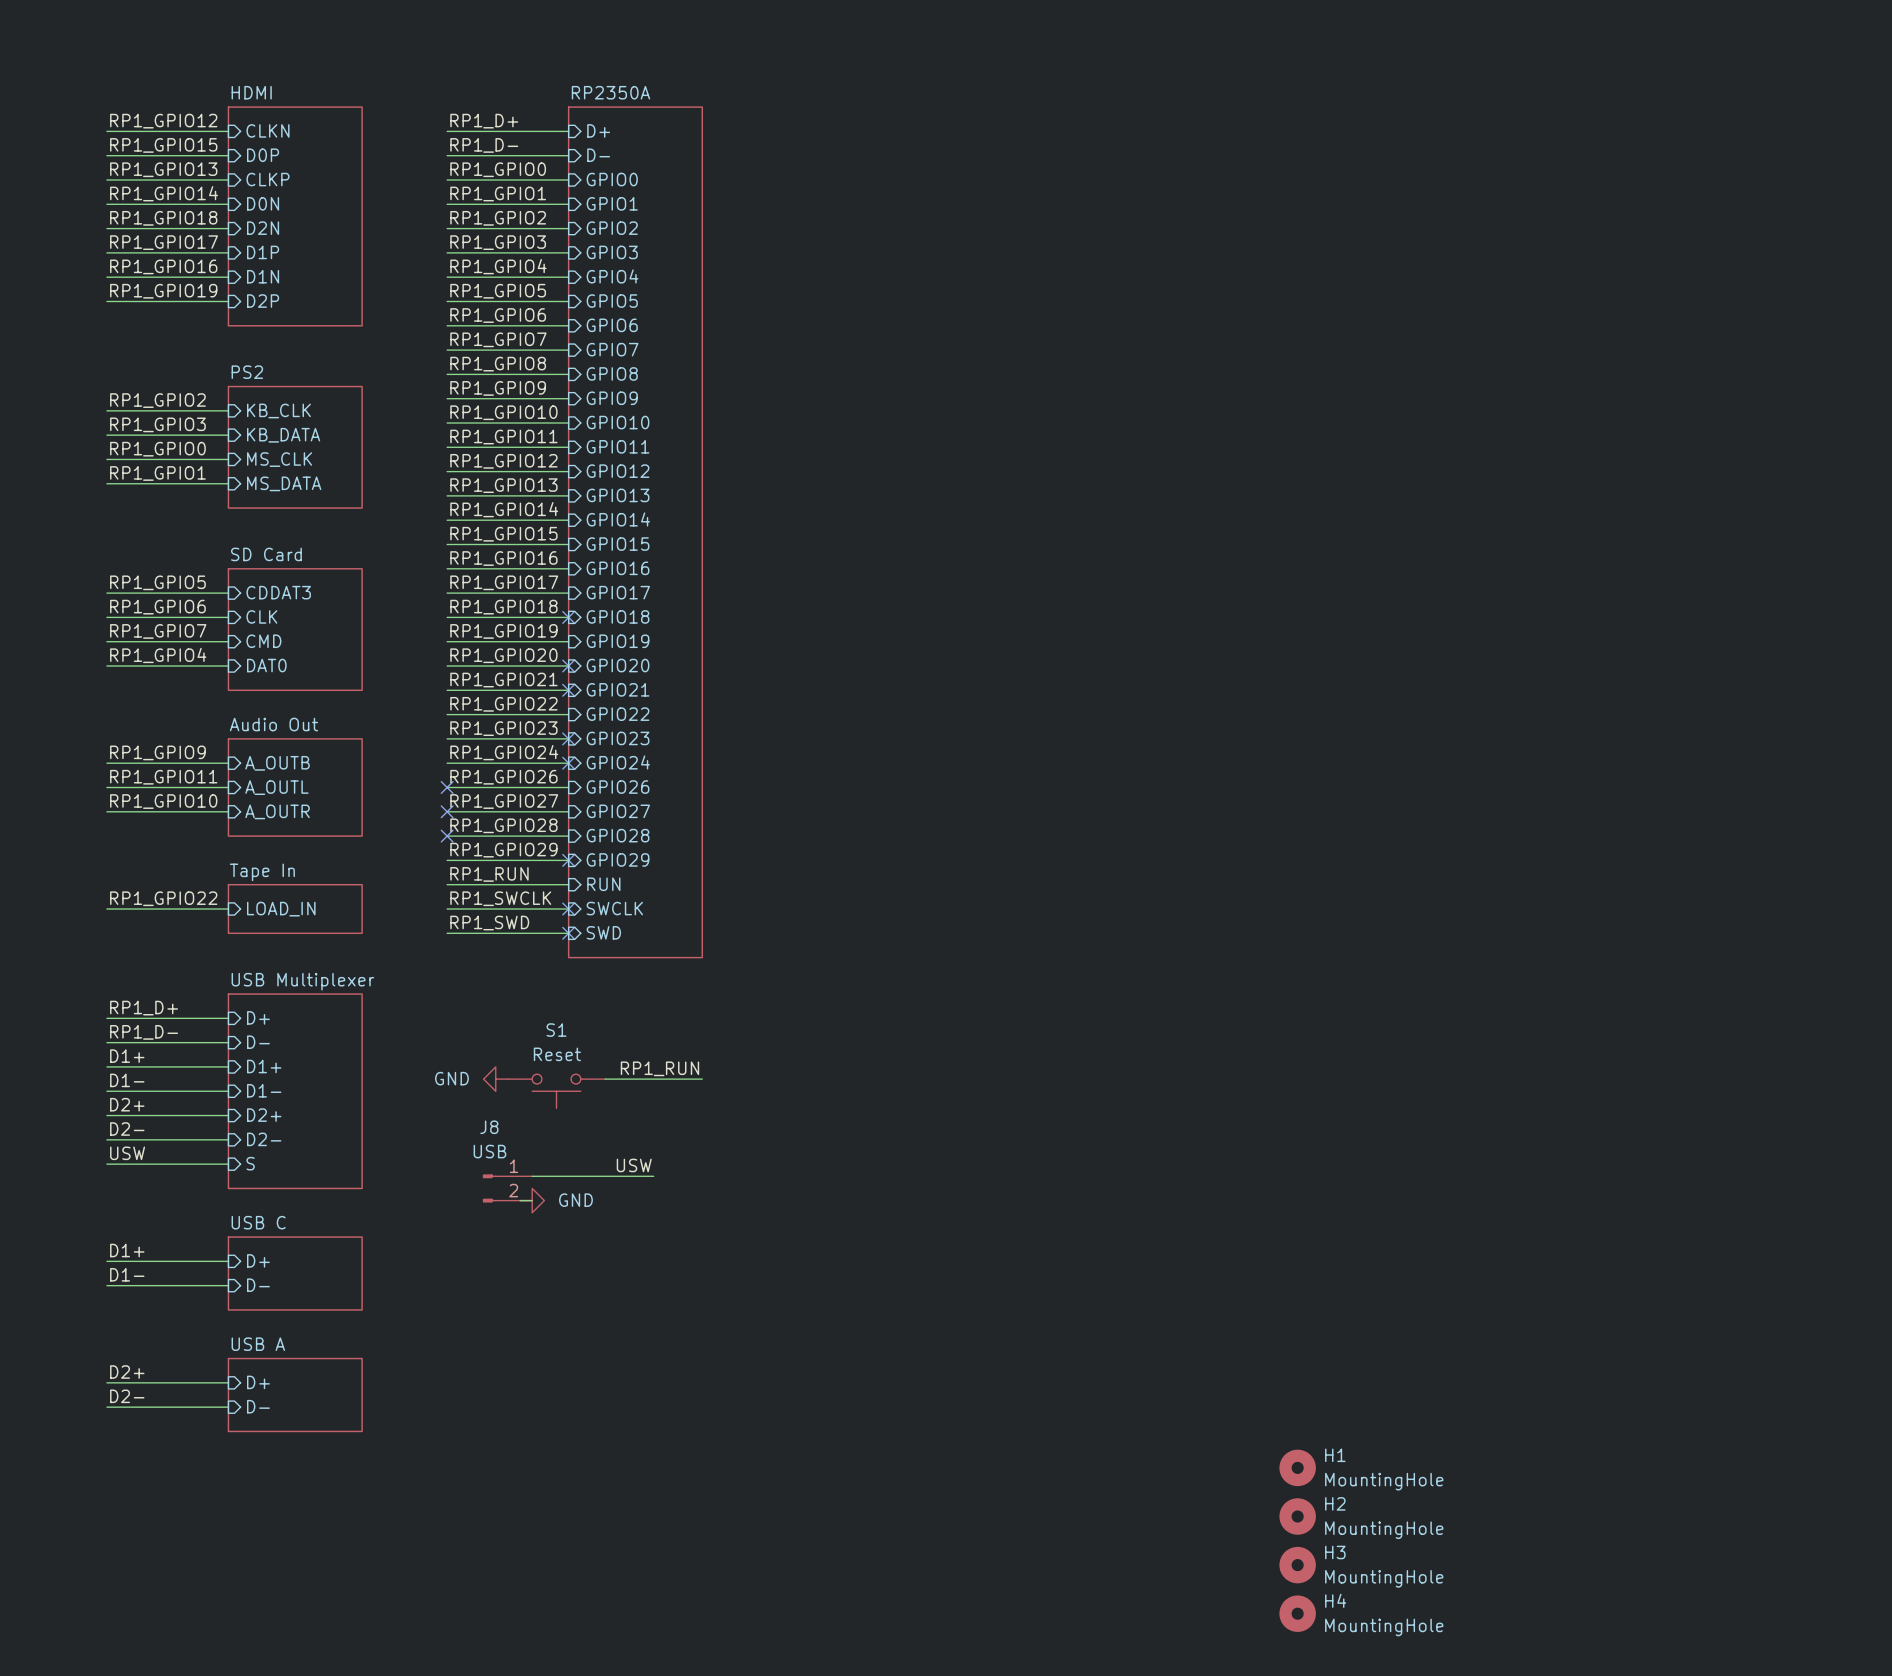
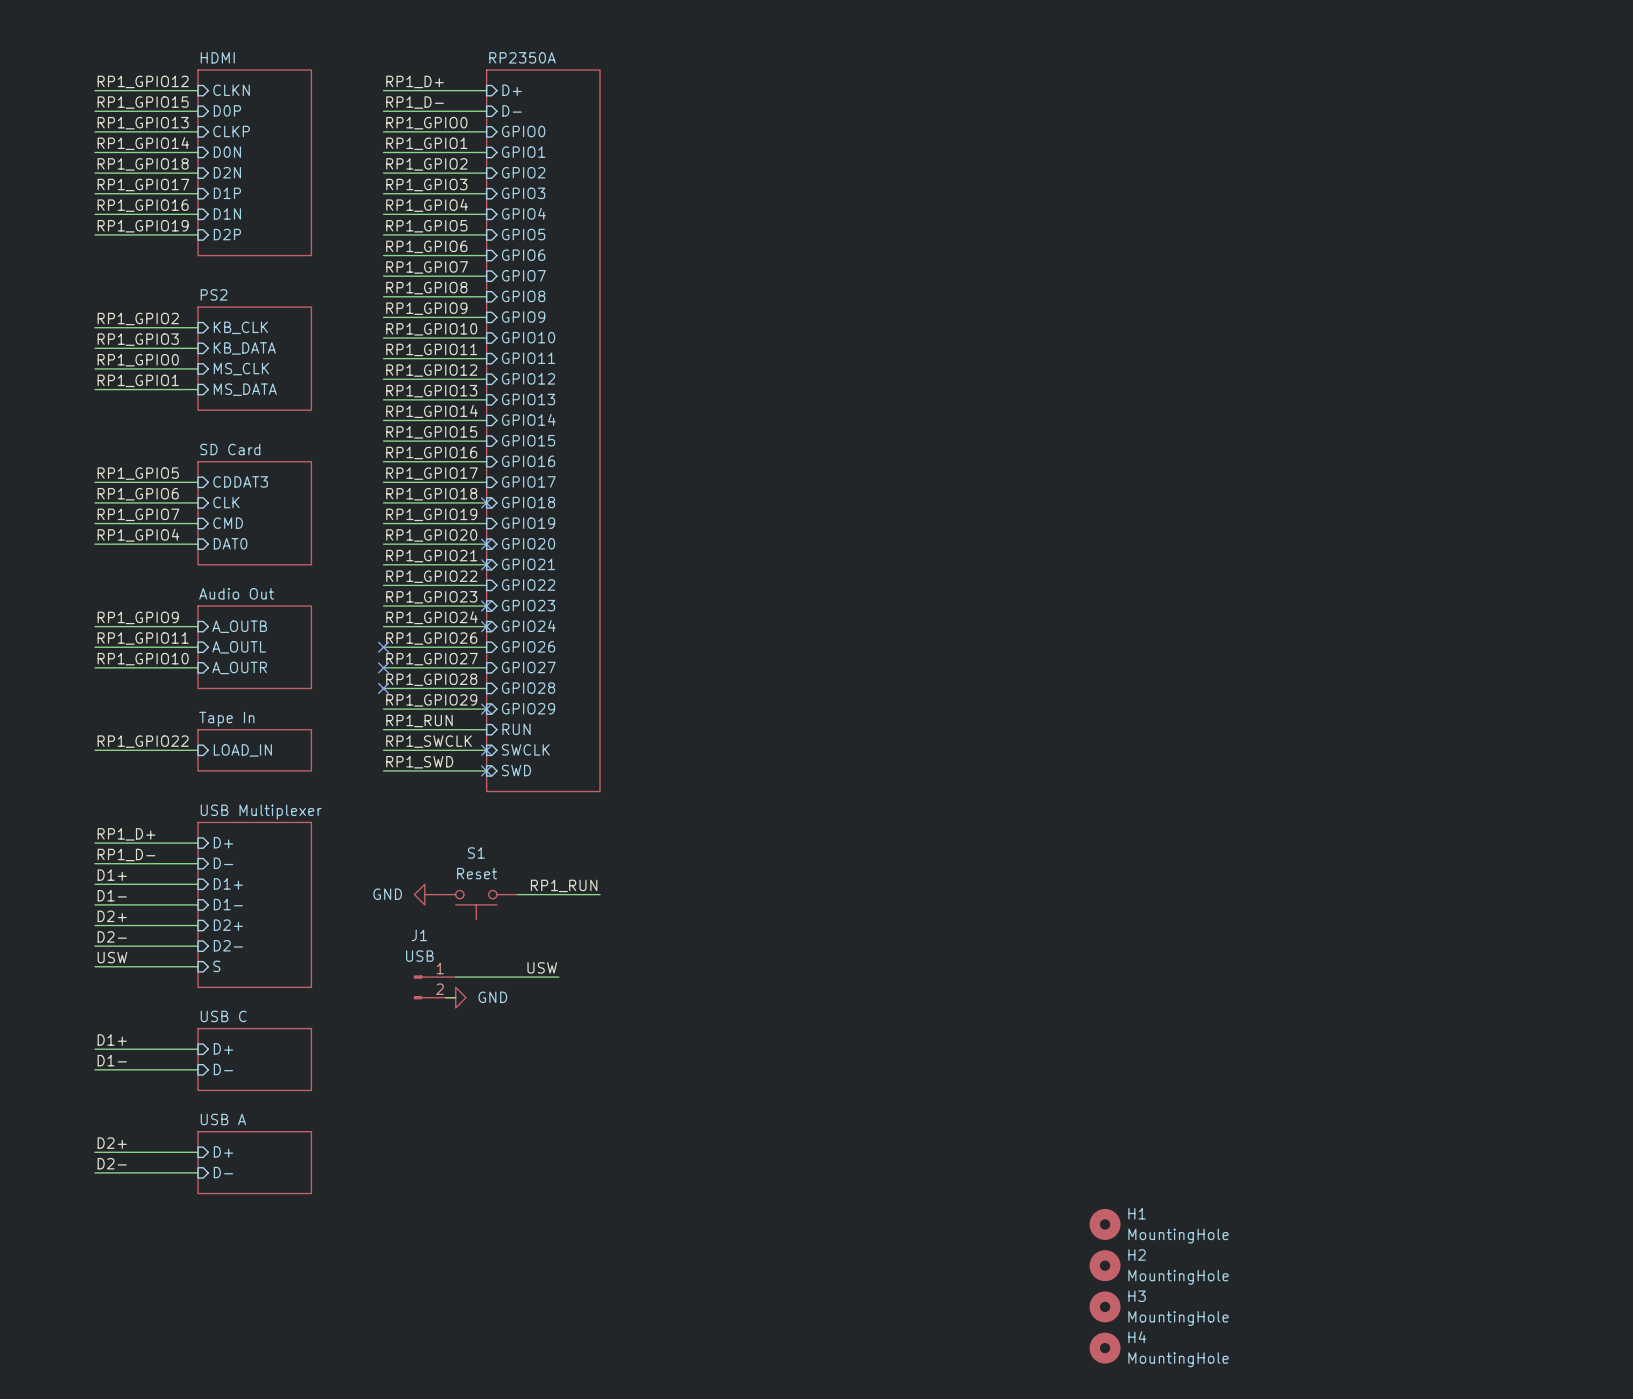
J8 name: J8 (489, 1127) -> J1 (419, 935)

